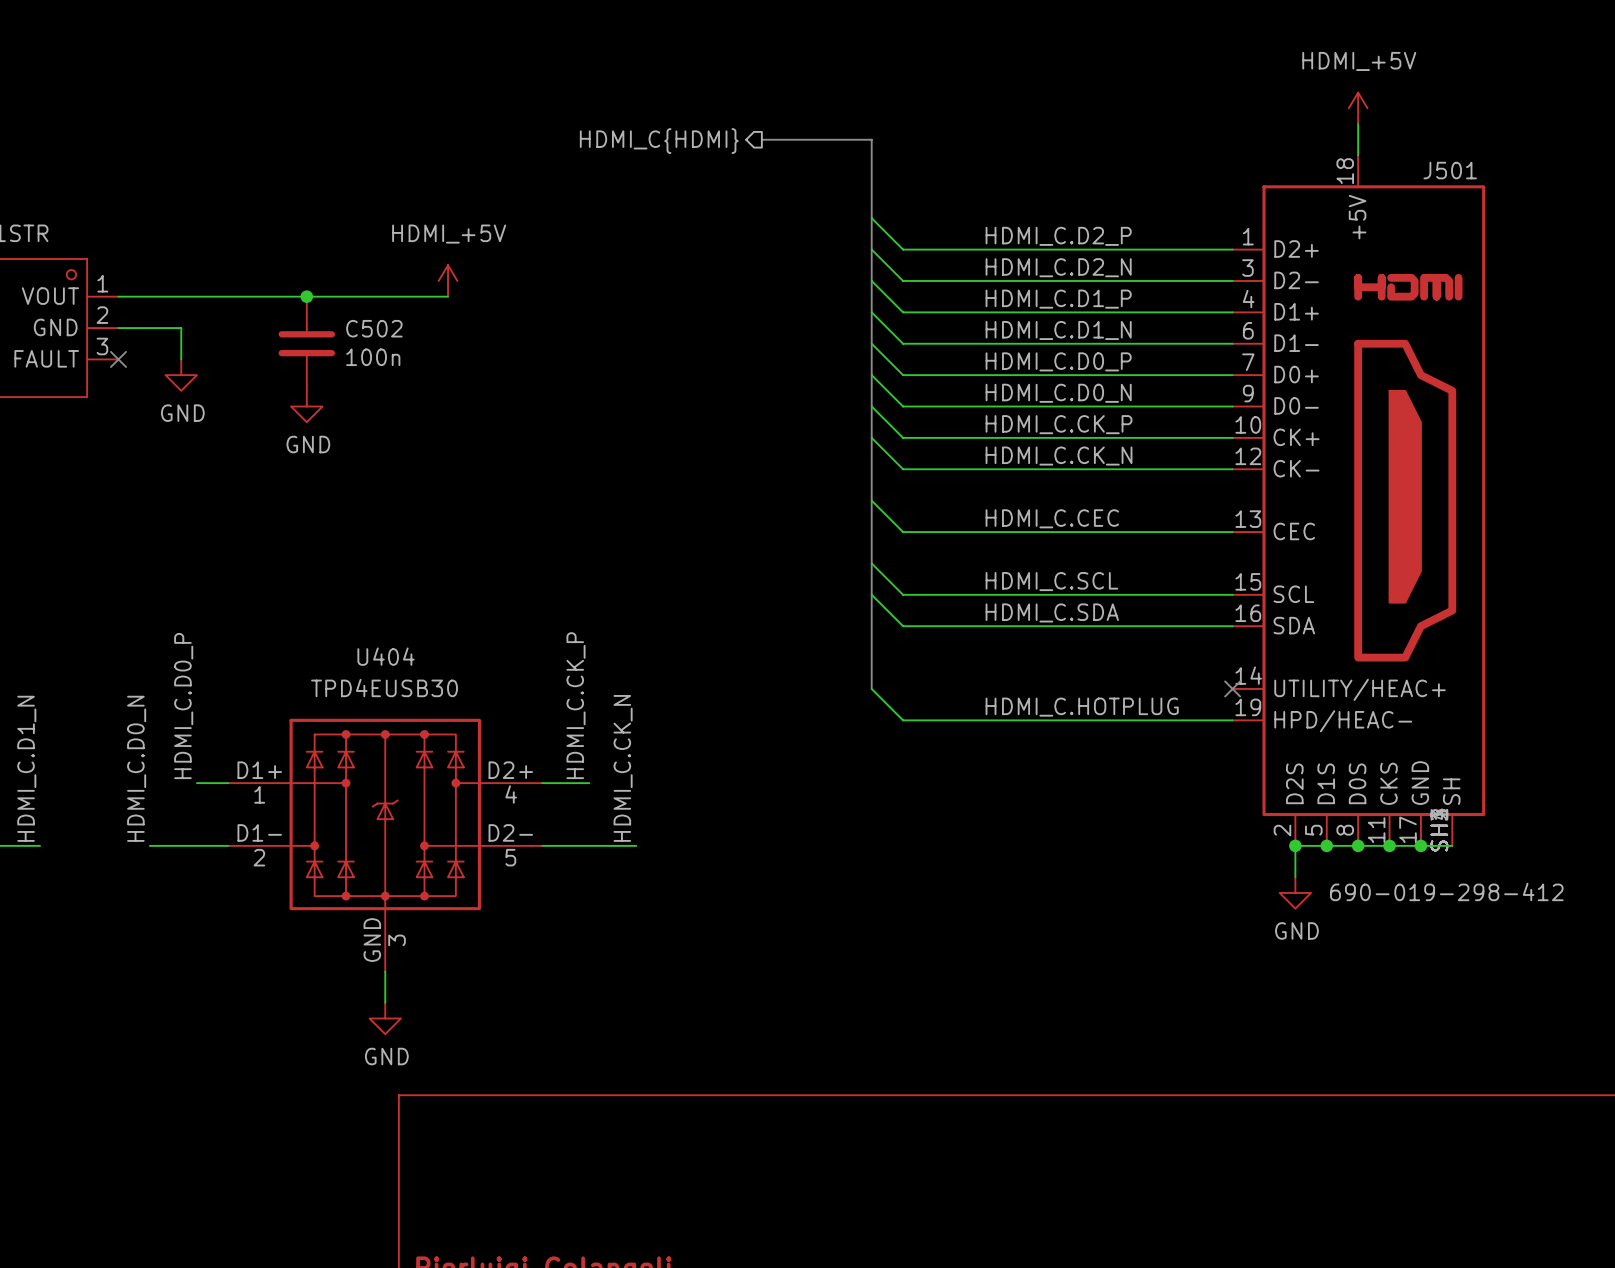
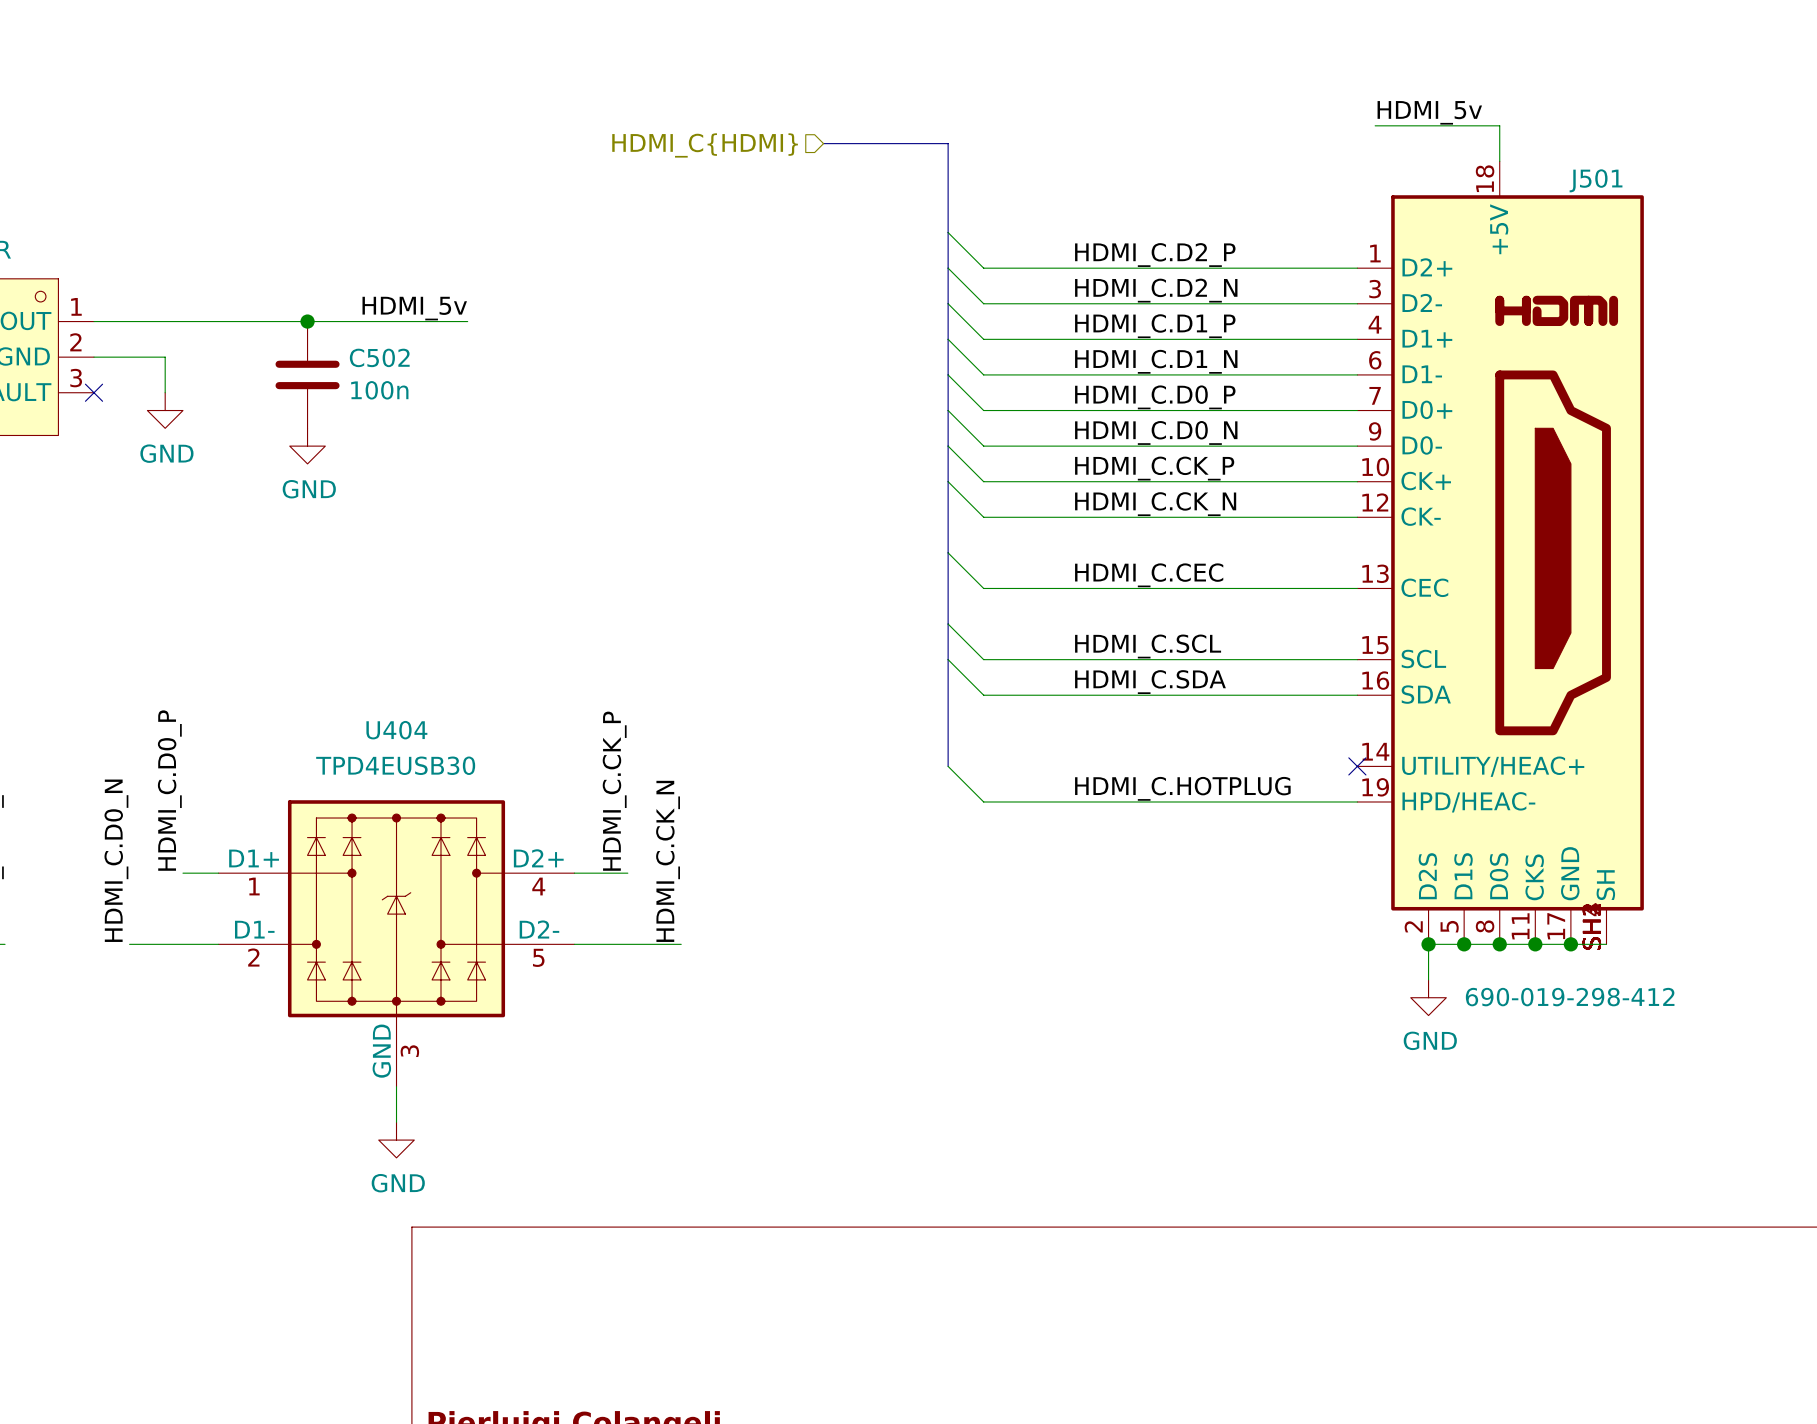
power symbol: HDMI_+5V (1358, 108) -> none
label: none -> HDMI_5v (1429, 112)
wire: none -> (1375, 125) (1499, 125)
hierarchical label shape: output (659, 141) -> input (705, 145)
power symbol: HDMI_+5V (448, 280) -> none
label: none -> HDMI_5v (414, 308)

